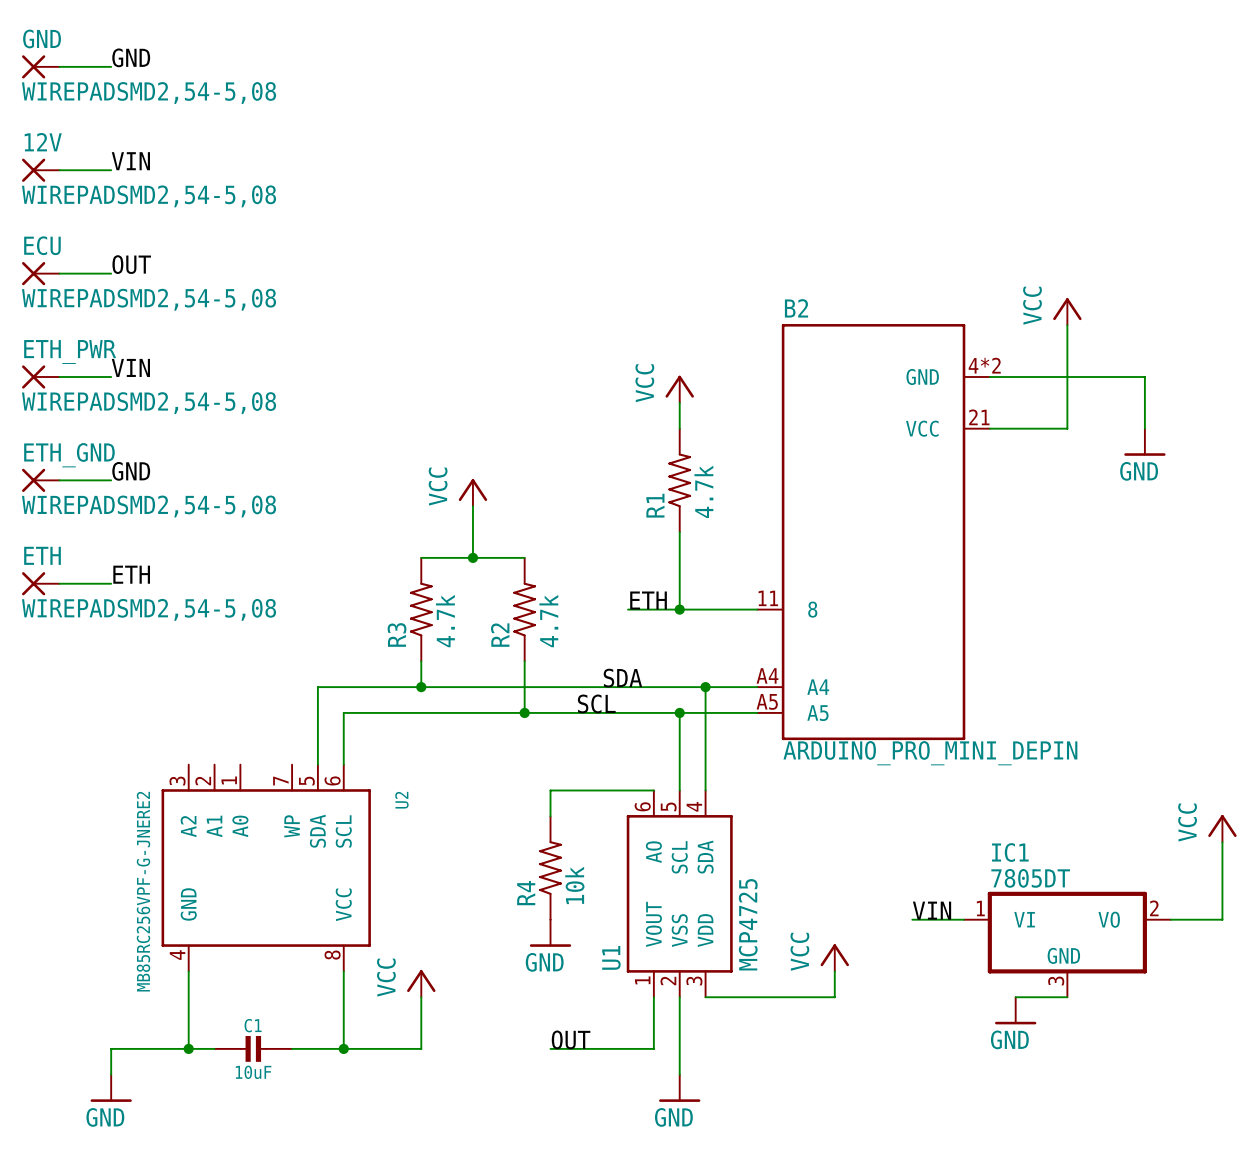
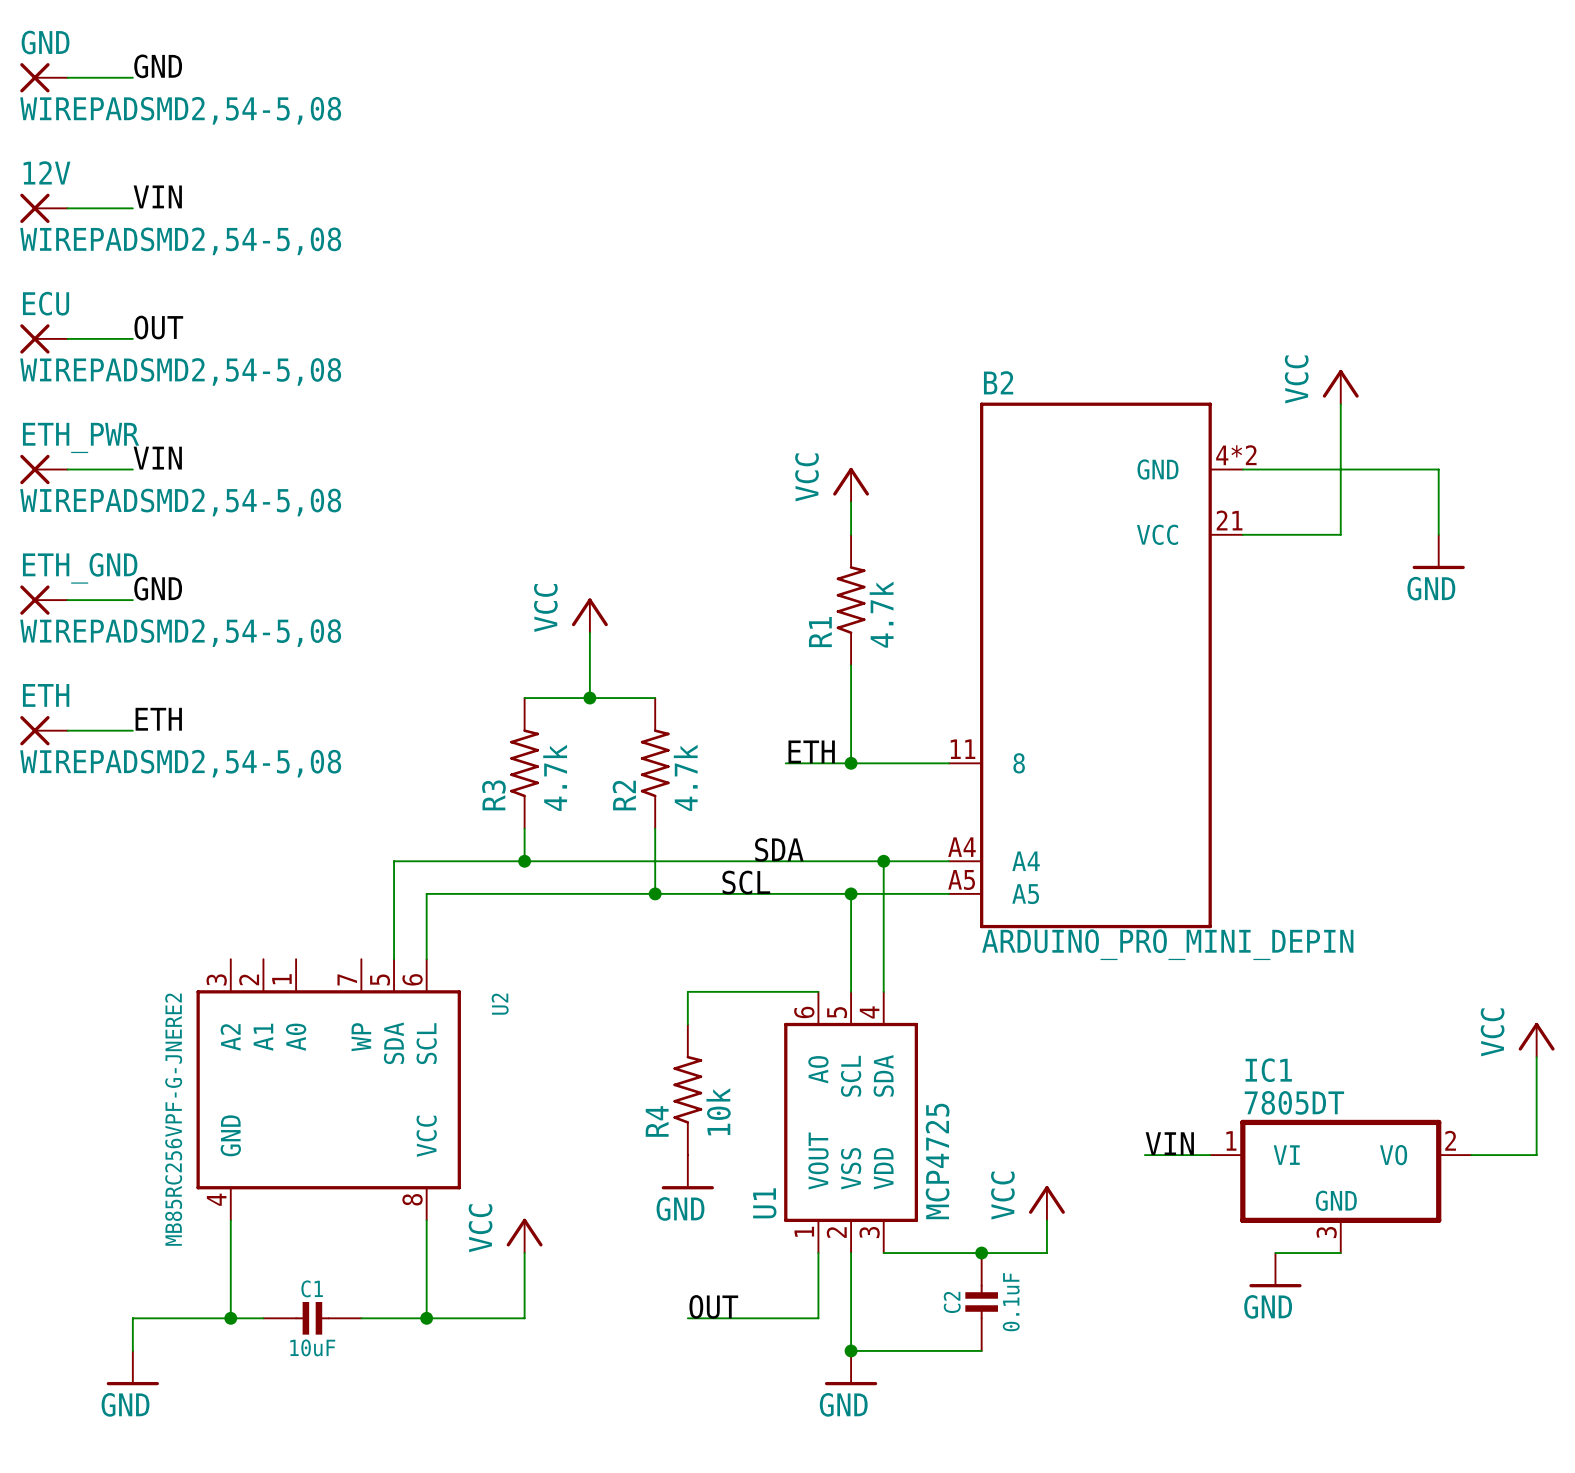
junction: none -> (981, 1253)
C2: none -> 0.1uF (981, 1301)
wire: none -> (851, 1350) (981, 1350)
junction: none -> (851, 1350)

